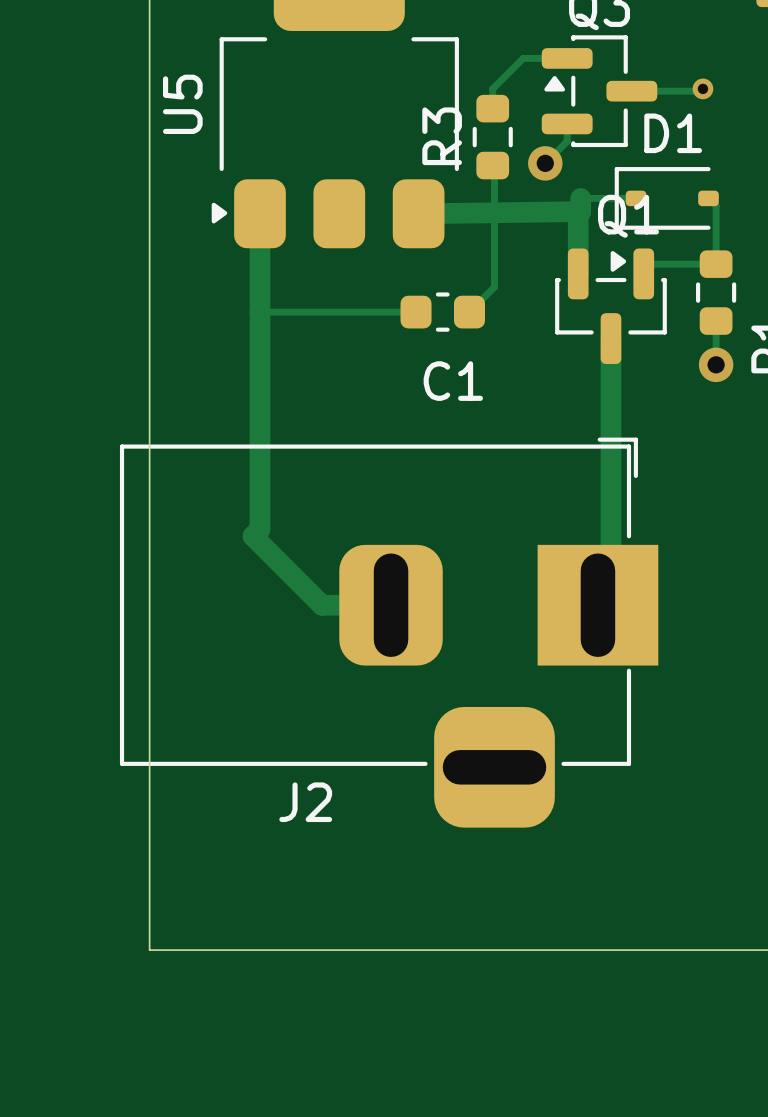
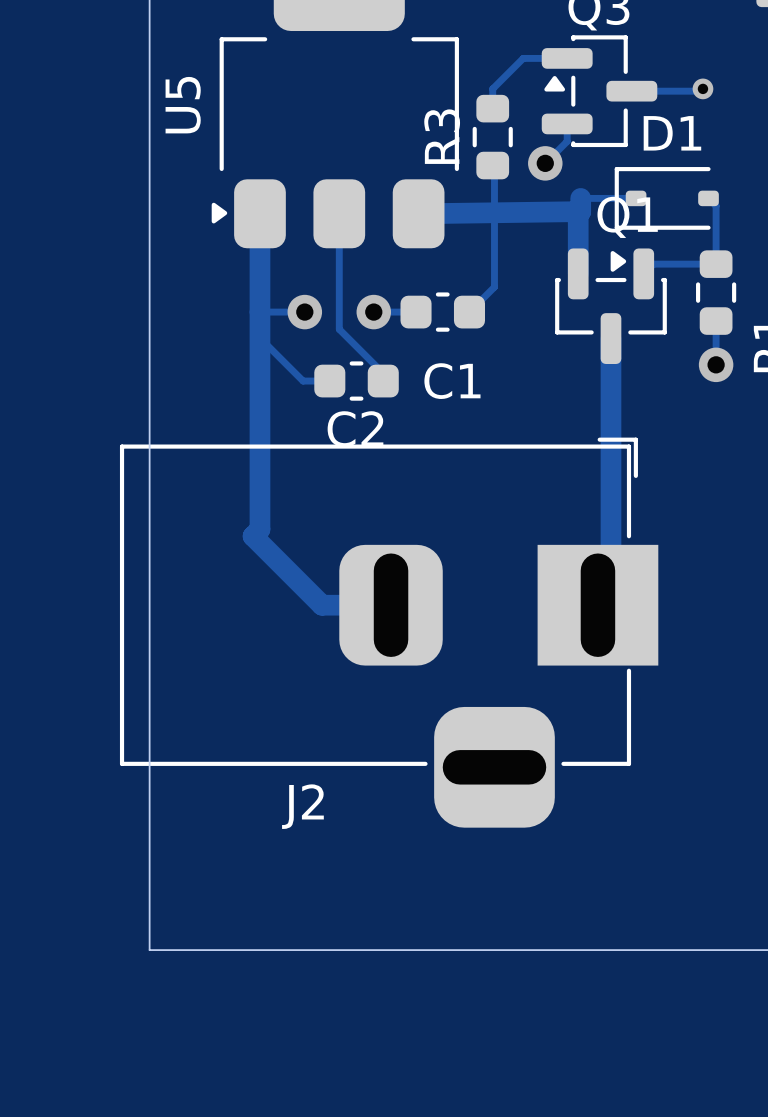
track: none -> (339, 213) (339, 329) (383, 373) (383, 381)
track: (304, 312) (373, 312) -> none
via: none -> (304, 312)
via: none -> (373, 312)
track: none -> (259, 337) (303, 381) (329, 381)
C2: none -> (356, 381)

